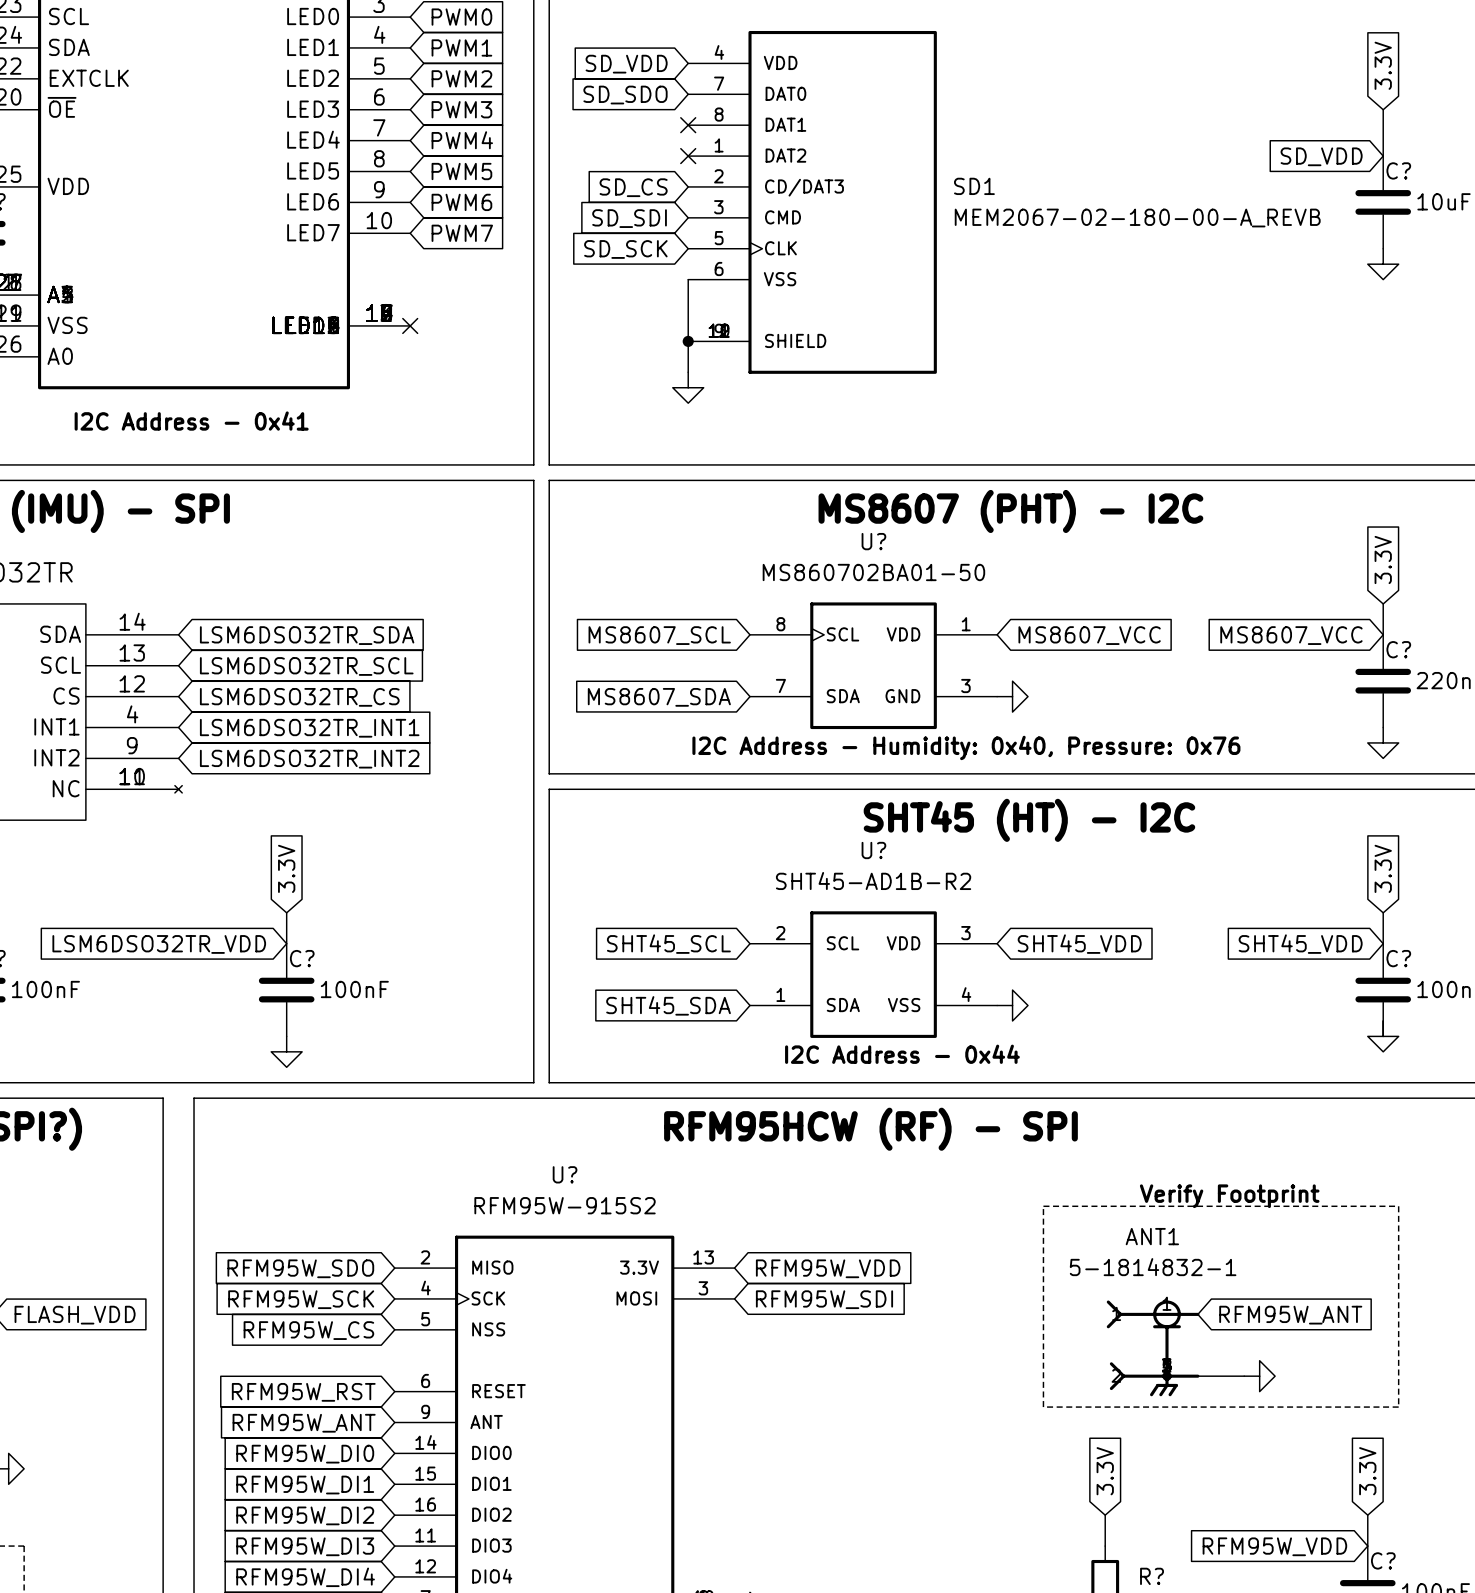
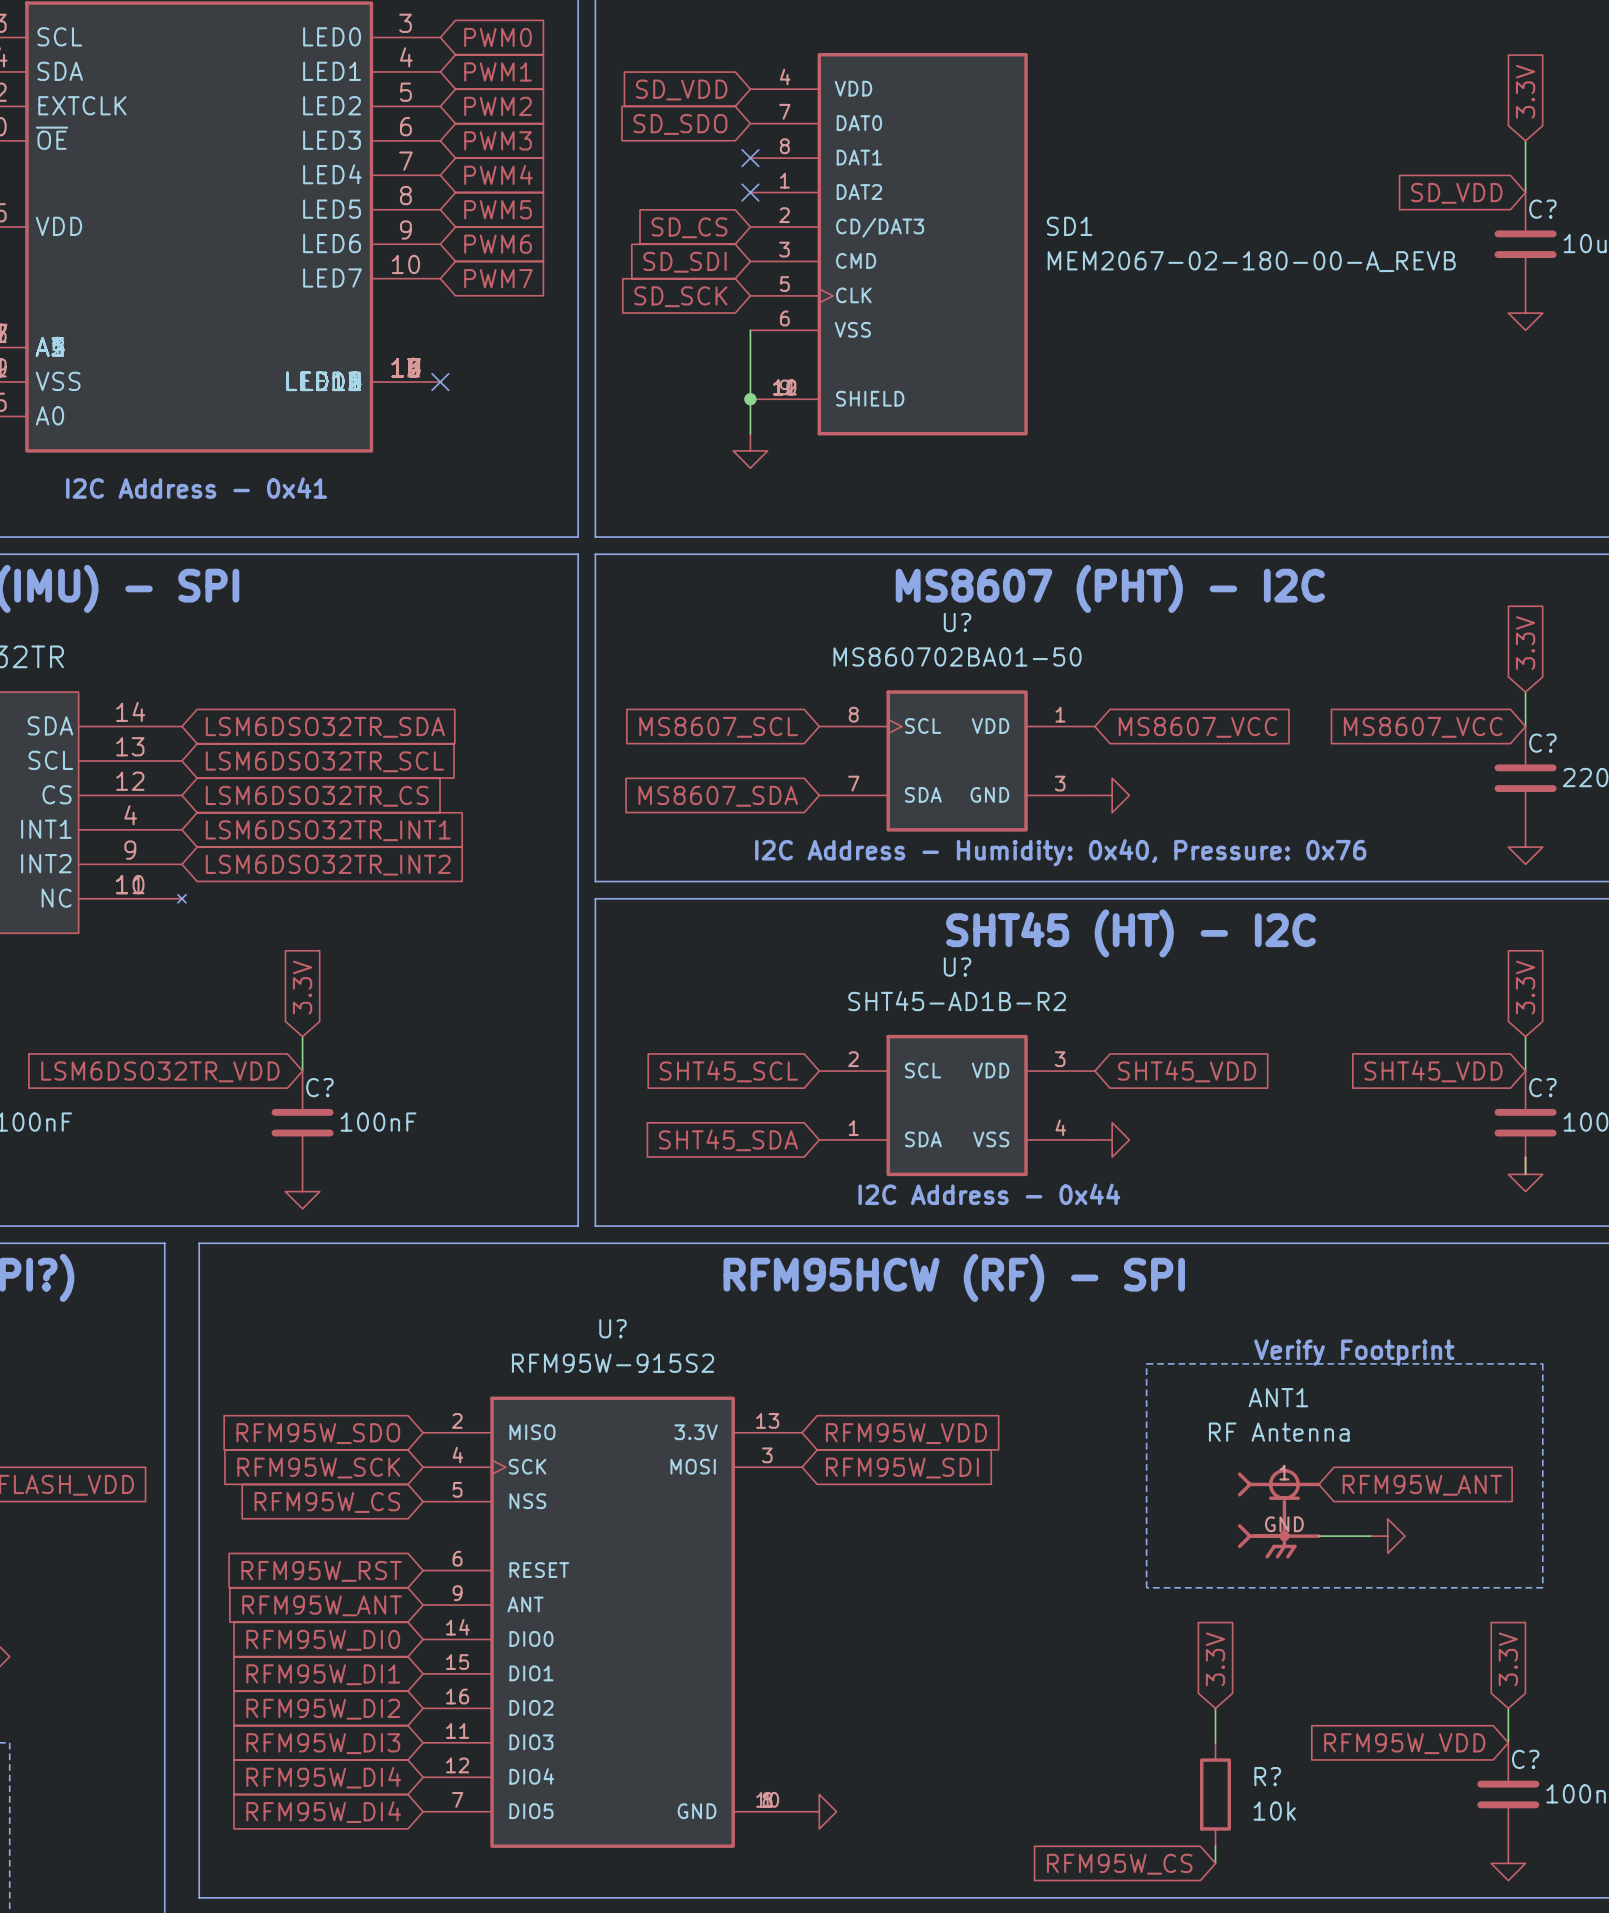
ANT1 value: 5-1814832-1 (1153, 1267) -> RF Antenna (1279, 1432)
ANT1 symbol: [1106, 1300, 1200, 1397] -> [1237, 1468, 1321, 1559]
wire: (1197, 1376) (1244, 1376) -> (1318, 1536) (1370, 1536)
power symbol position: (1259, 1376) -> (1387, 1536)

